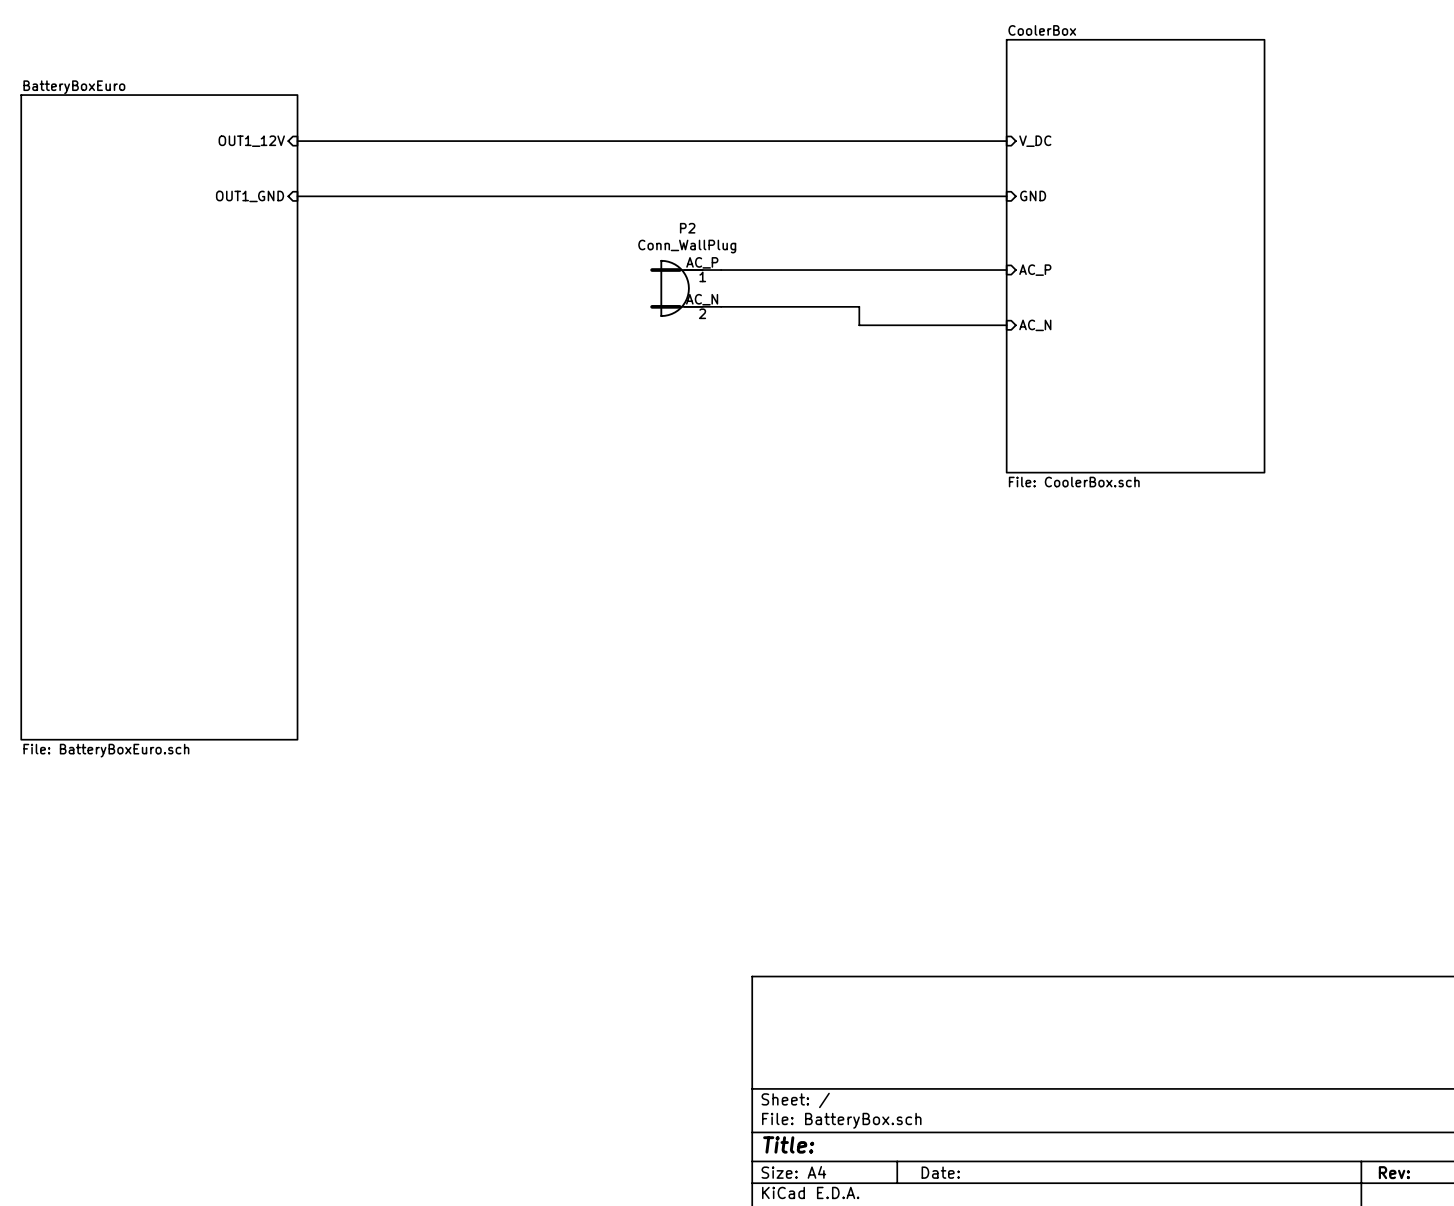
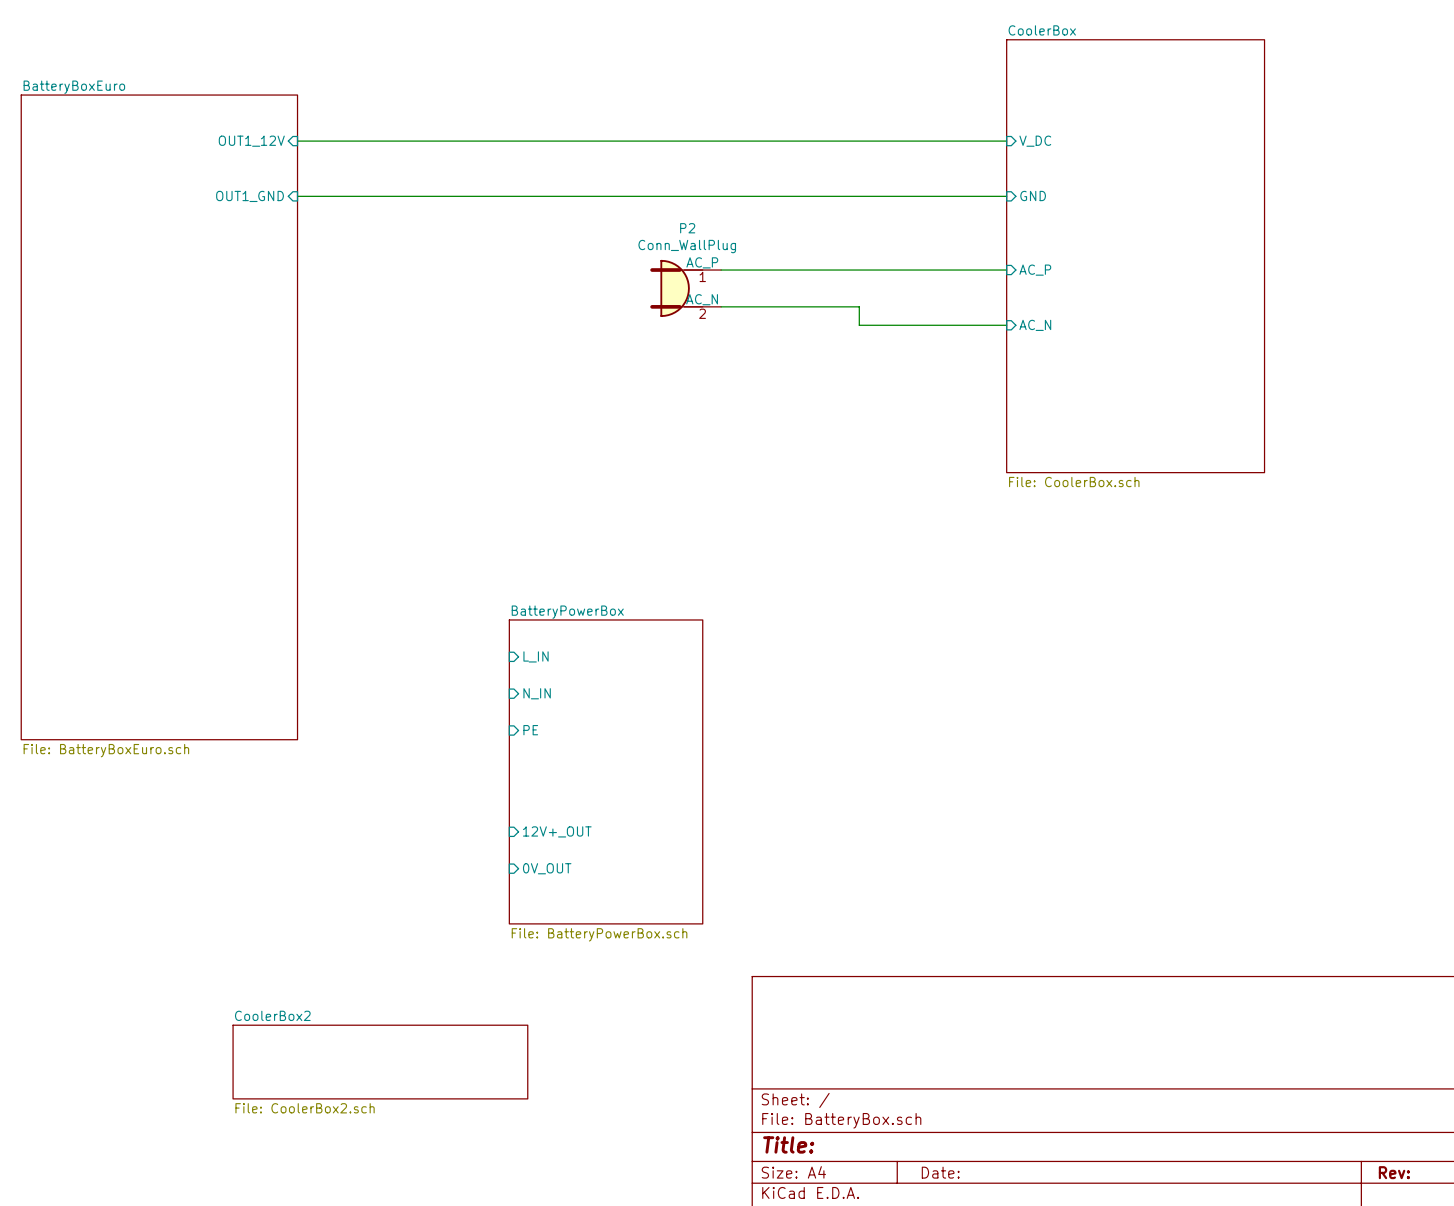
sheet pin: none -> L_IN (536, 656)
sheet pin: none -> N_IN (537, 693)
sheet pin: none -> PE (530, 730)
sheet BatteryPowerBox: none -> File: BatteryPowerBox.sch (606, 771)
sheet pin: none -> 12V+_OUT (557, 831)
sheet pin: none -> 0V_OUT (547, 868)
sheet CoolerBox2: none -> File: CoolerBox2.sch (380, 1062)

